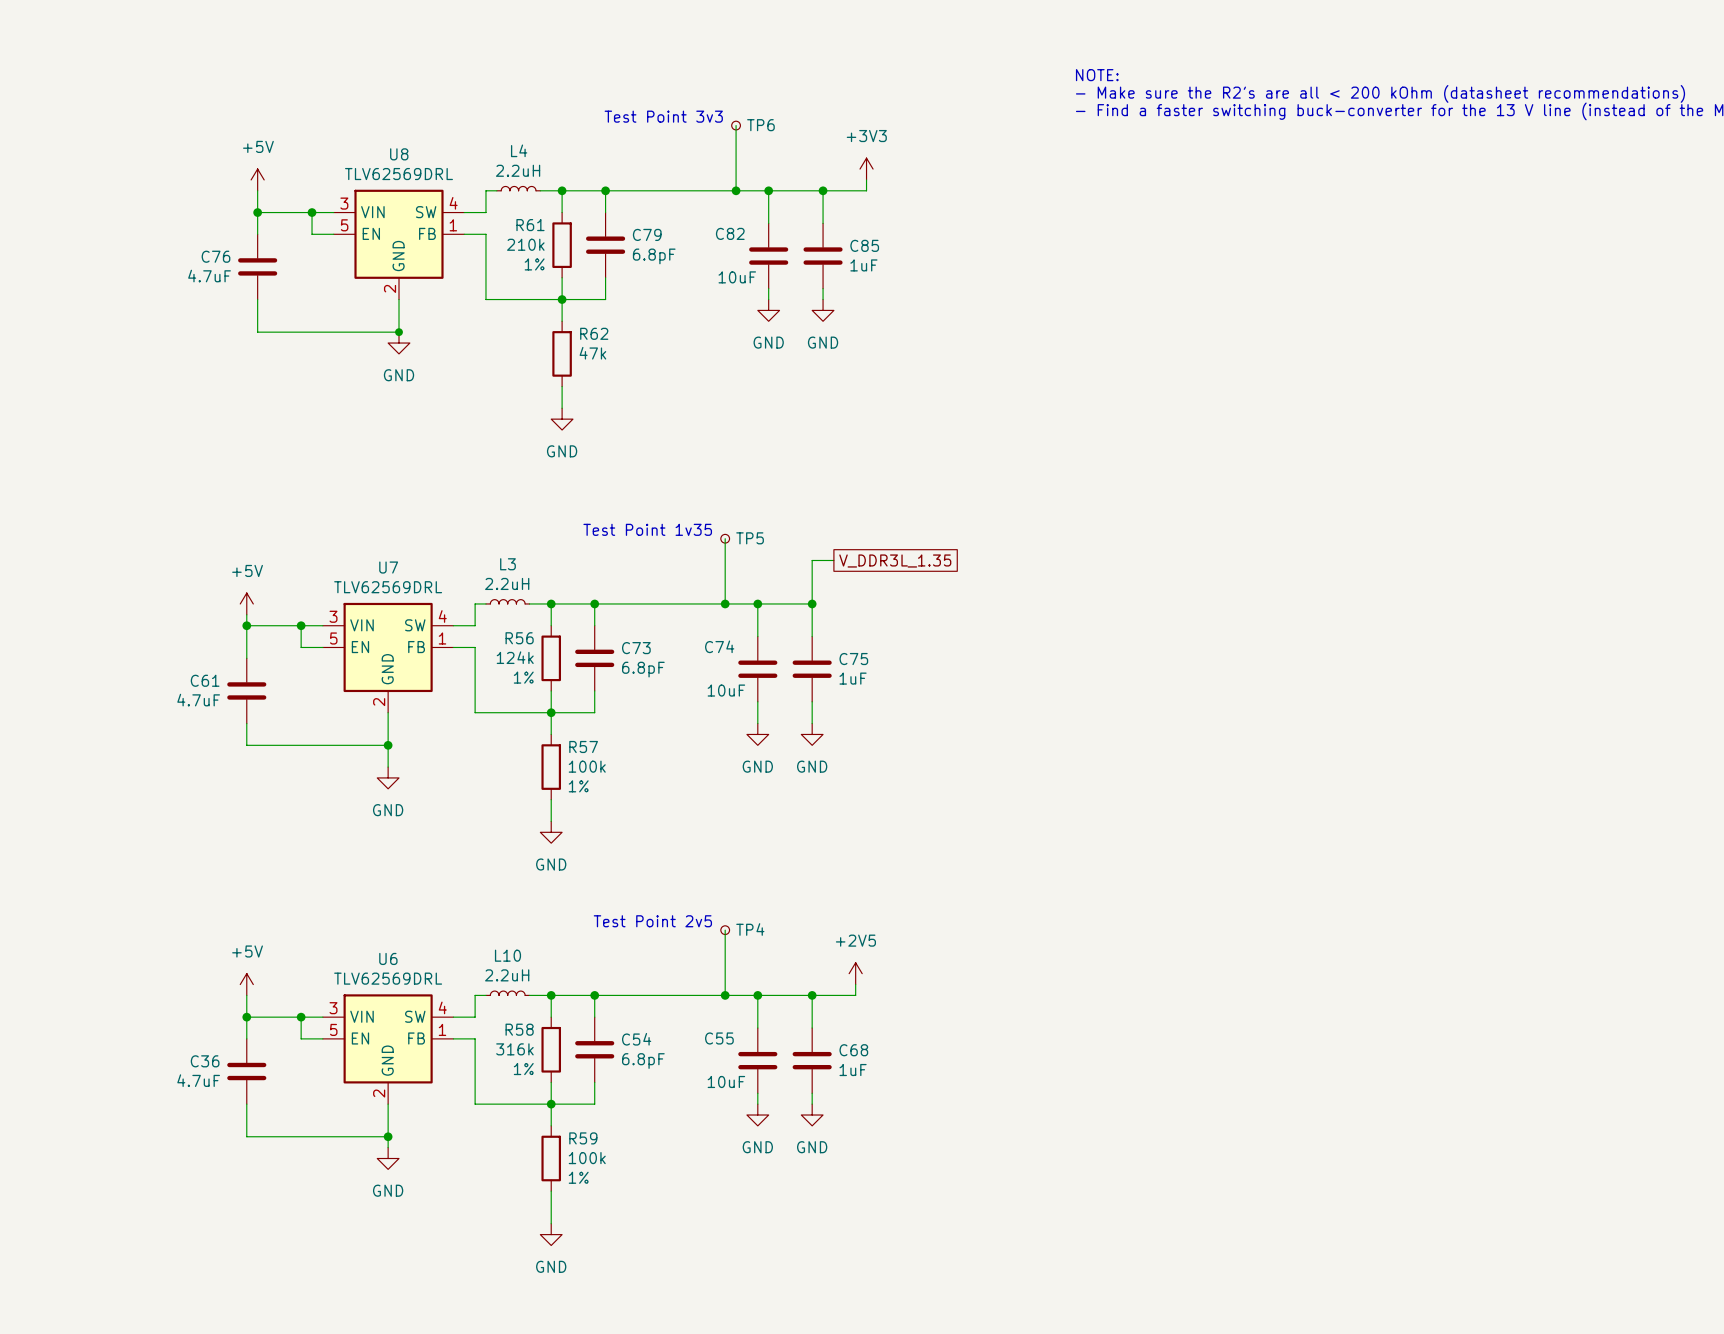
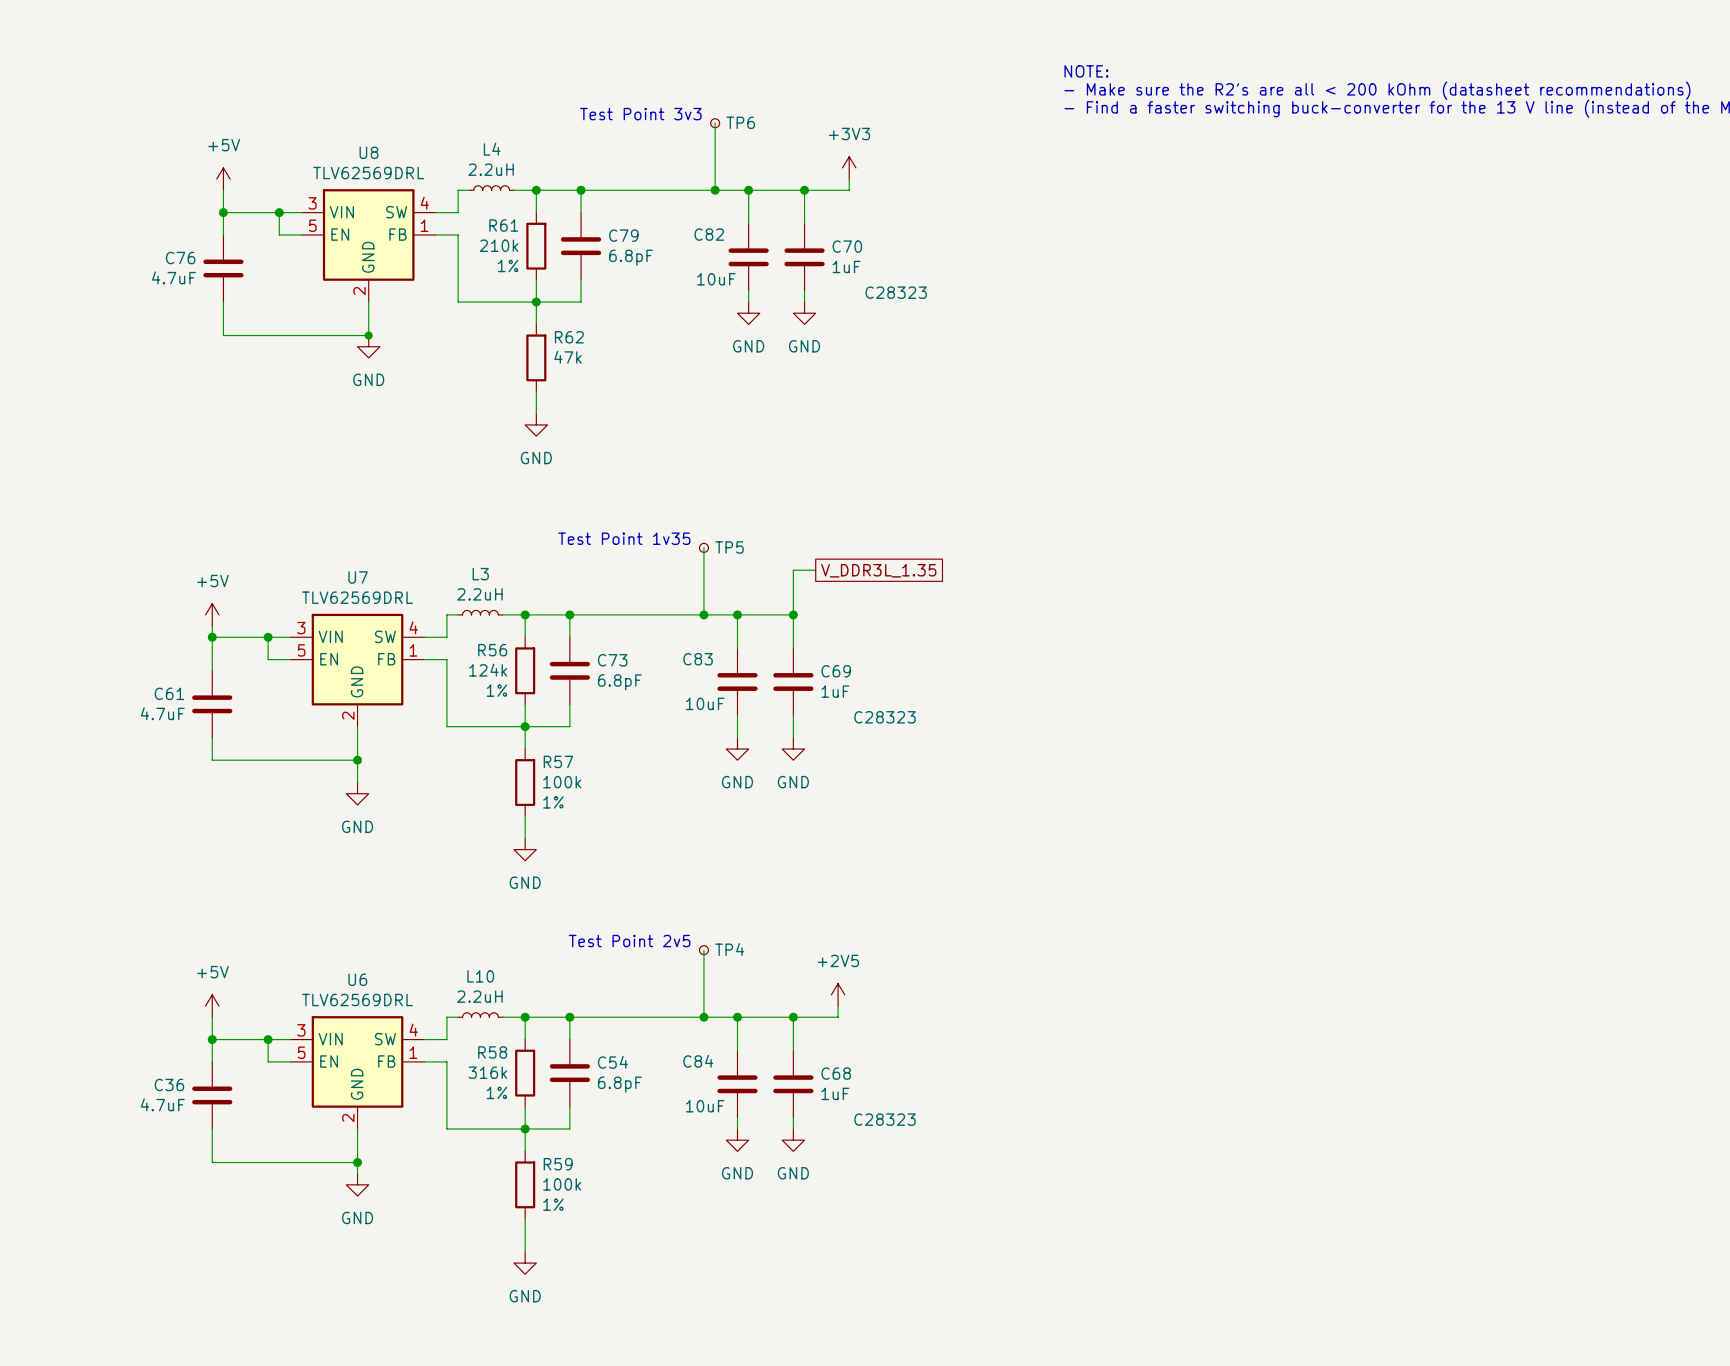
C85 name: C85 (864, 245) -> C70 (847, 246)
C85 text: none -> C28323 (896, 292)
C74 name: C74 (719, 646) -> C83 (698, 659)
C75 name: C75 (853, 659) -> C69 (836, 671)
C75 text: none -> C28323 (885, 717)
C55 name: C55 (719, 1038) -> C84 (698, 1061)
C68 text: none -> C28323 (885, 1119)

